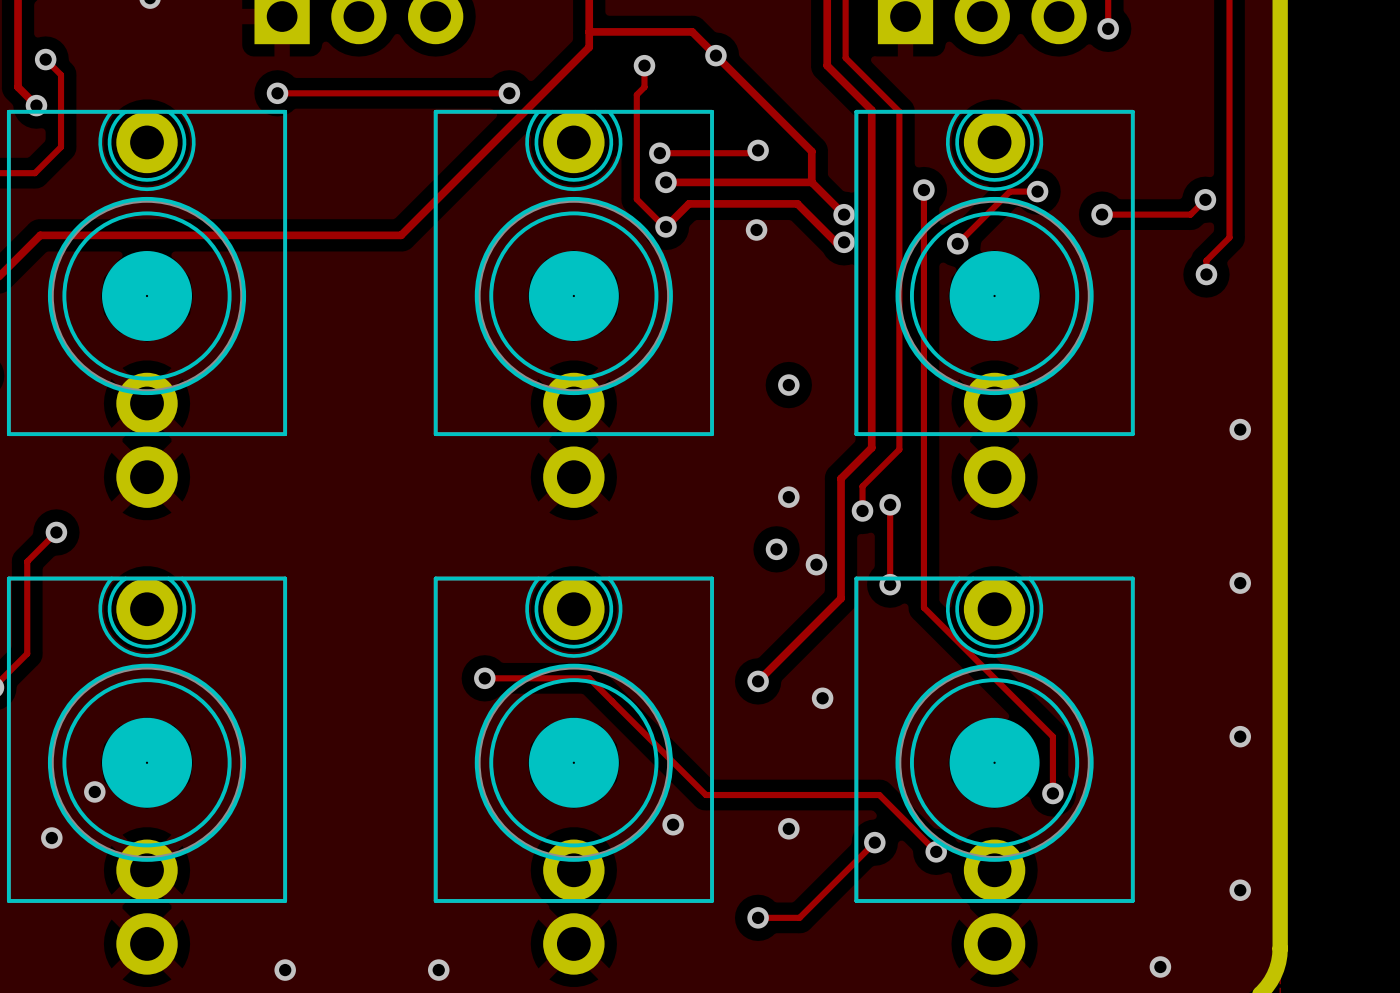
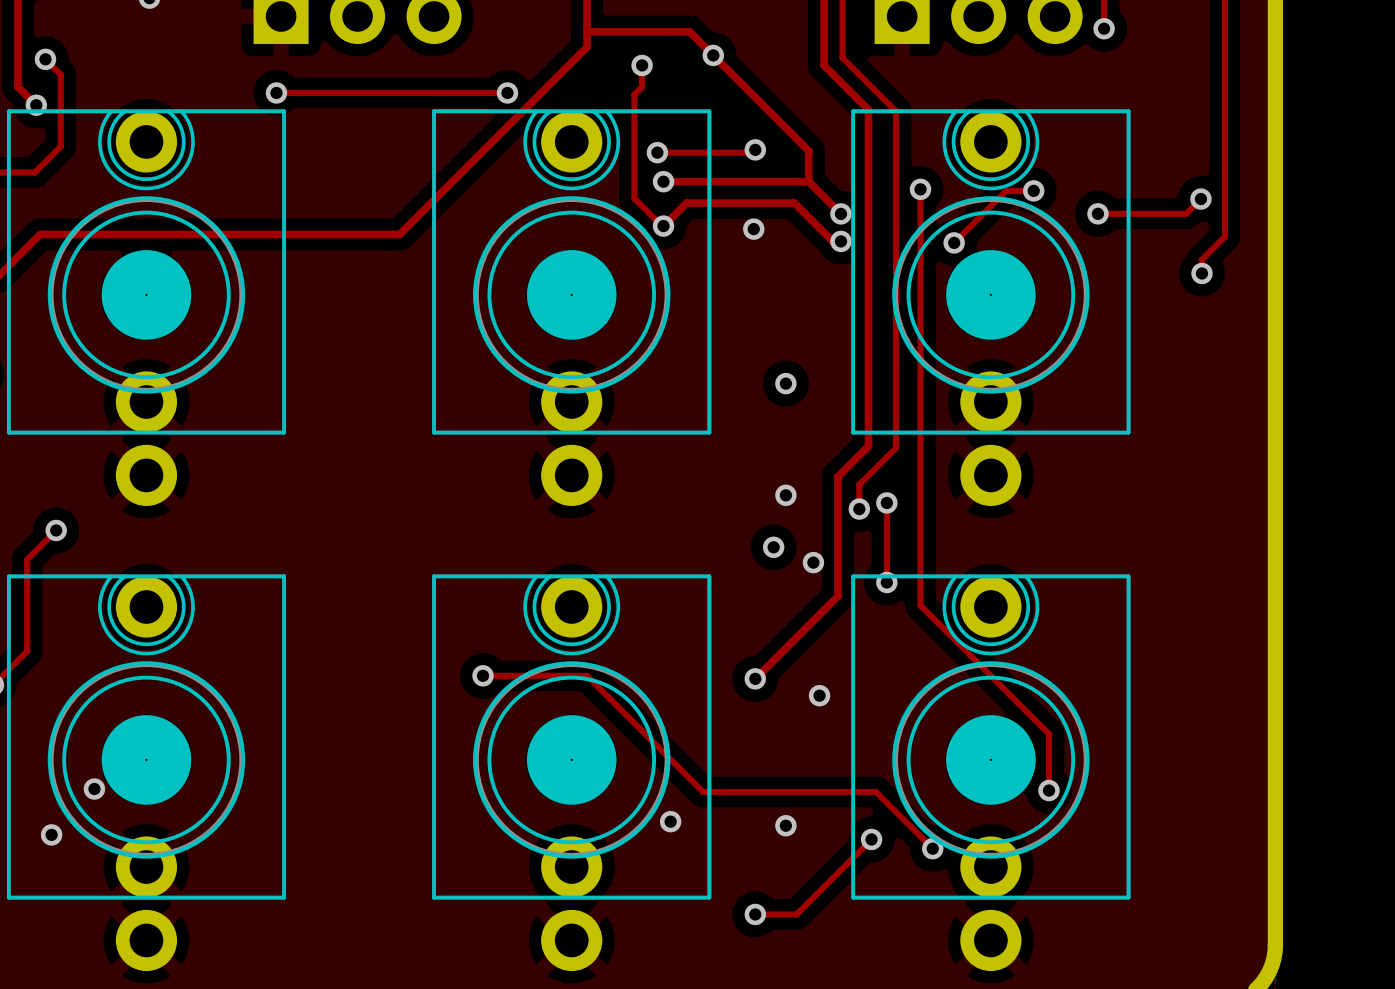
via: (1240, 429) -> none
via: (1240, 583) -> none
via: (1240, 736) -> none
via: (1240, 890) -> none
via: (1160, 966) -> none
via: (285, 970) -> none
via: (438, 970) -> none

